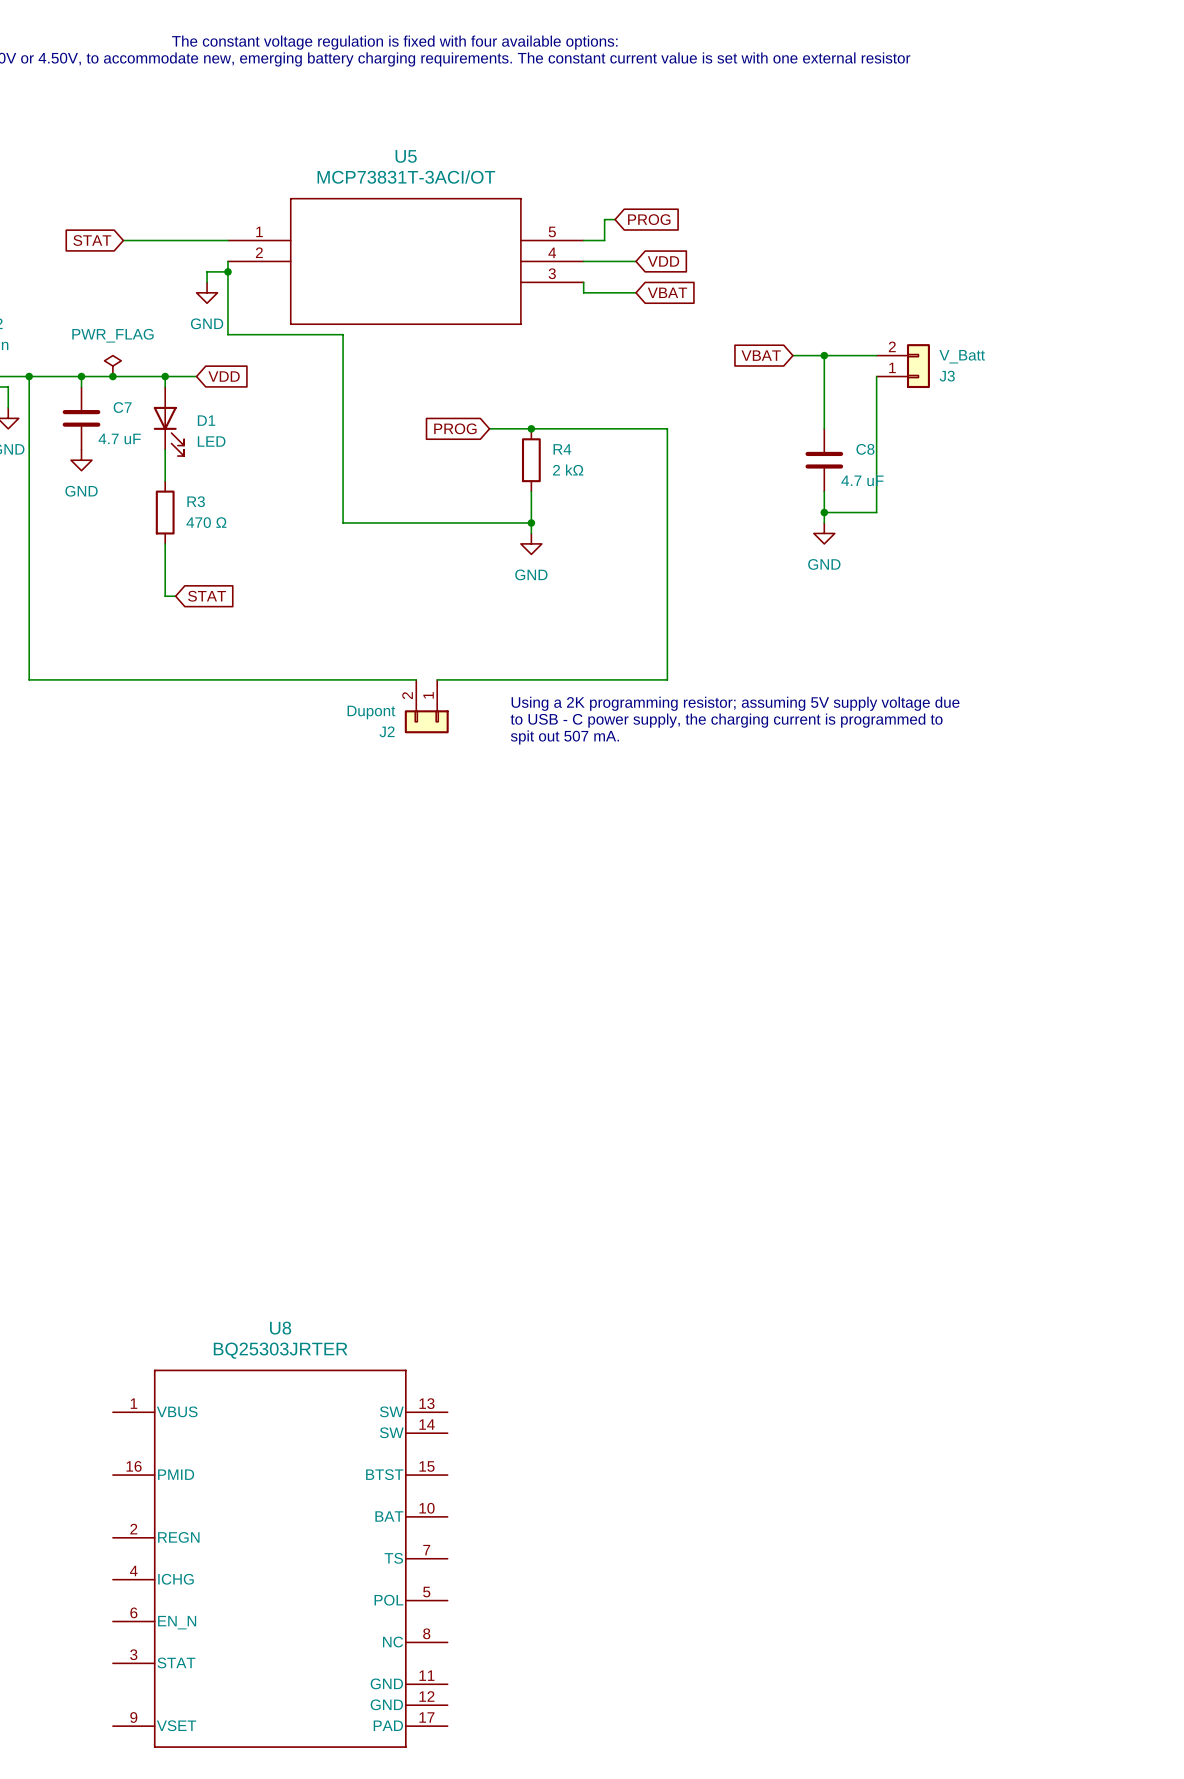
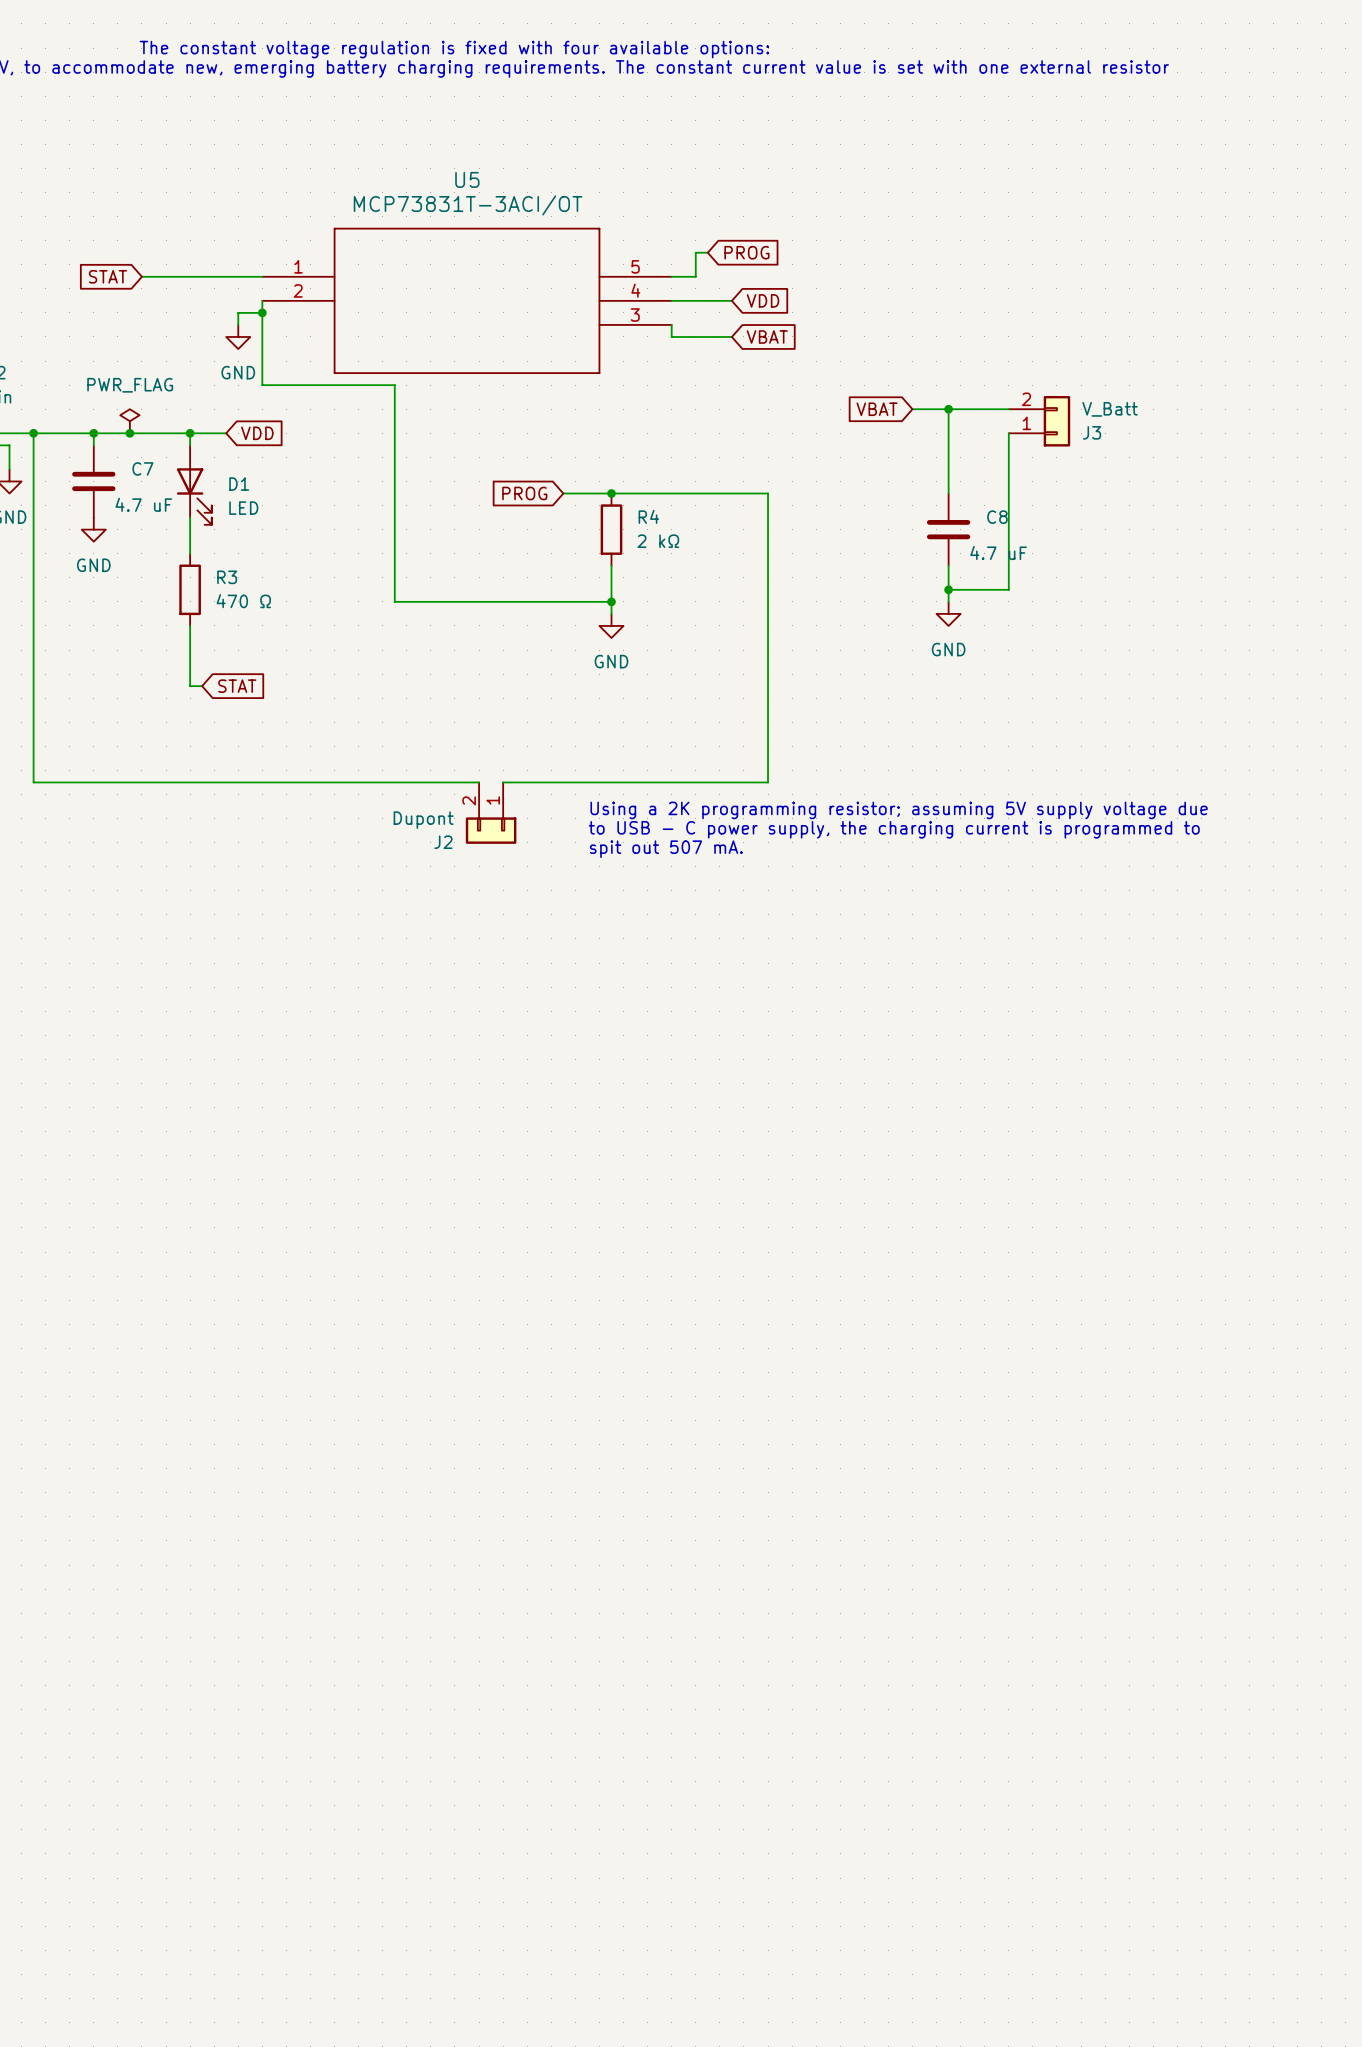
U8: BQ25303JRTER (280, 1558) -> none

